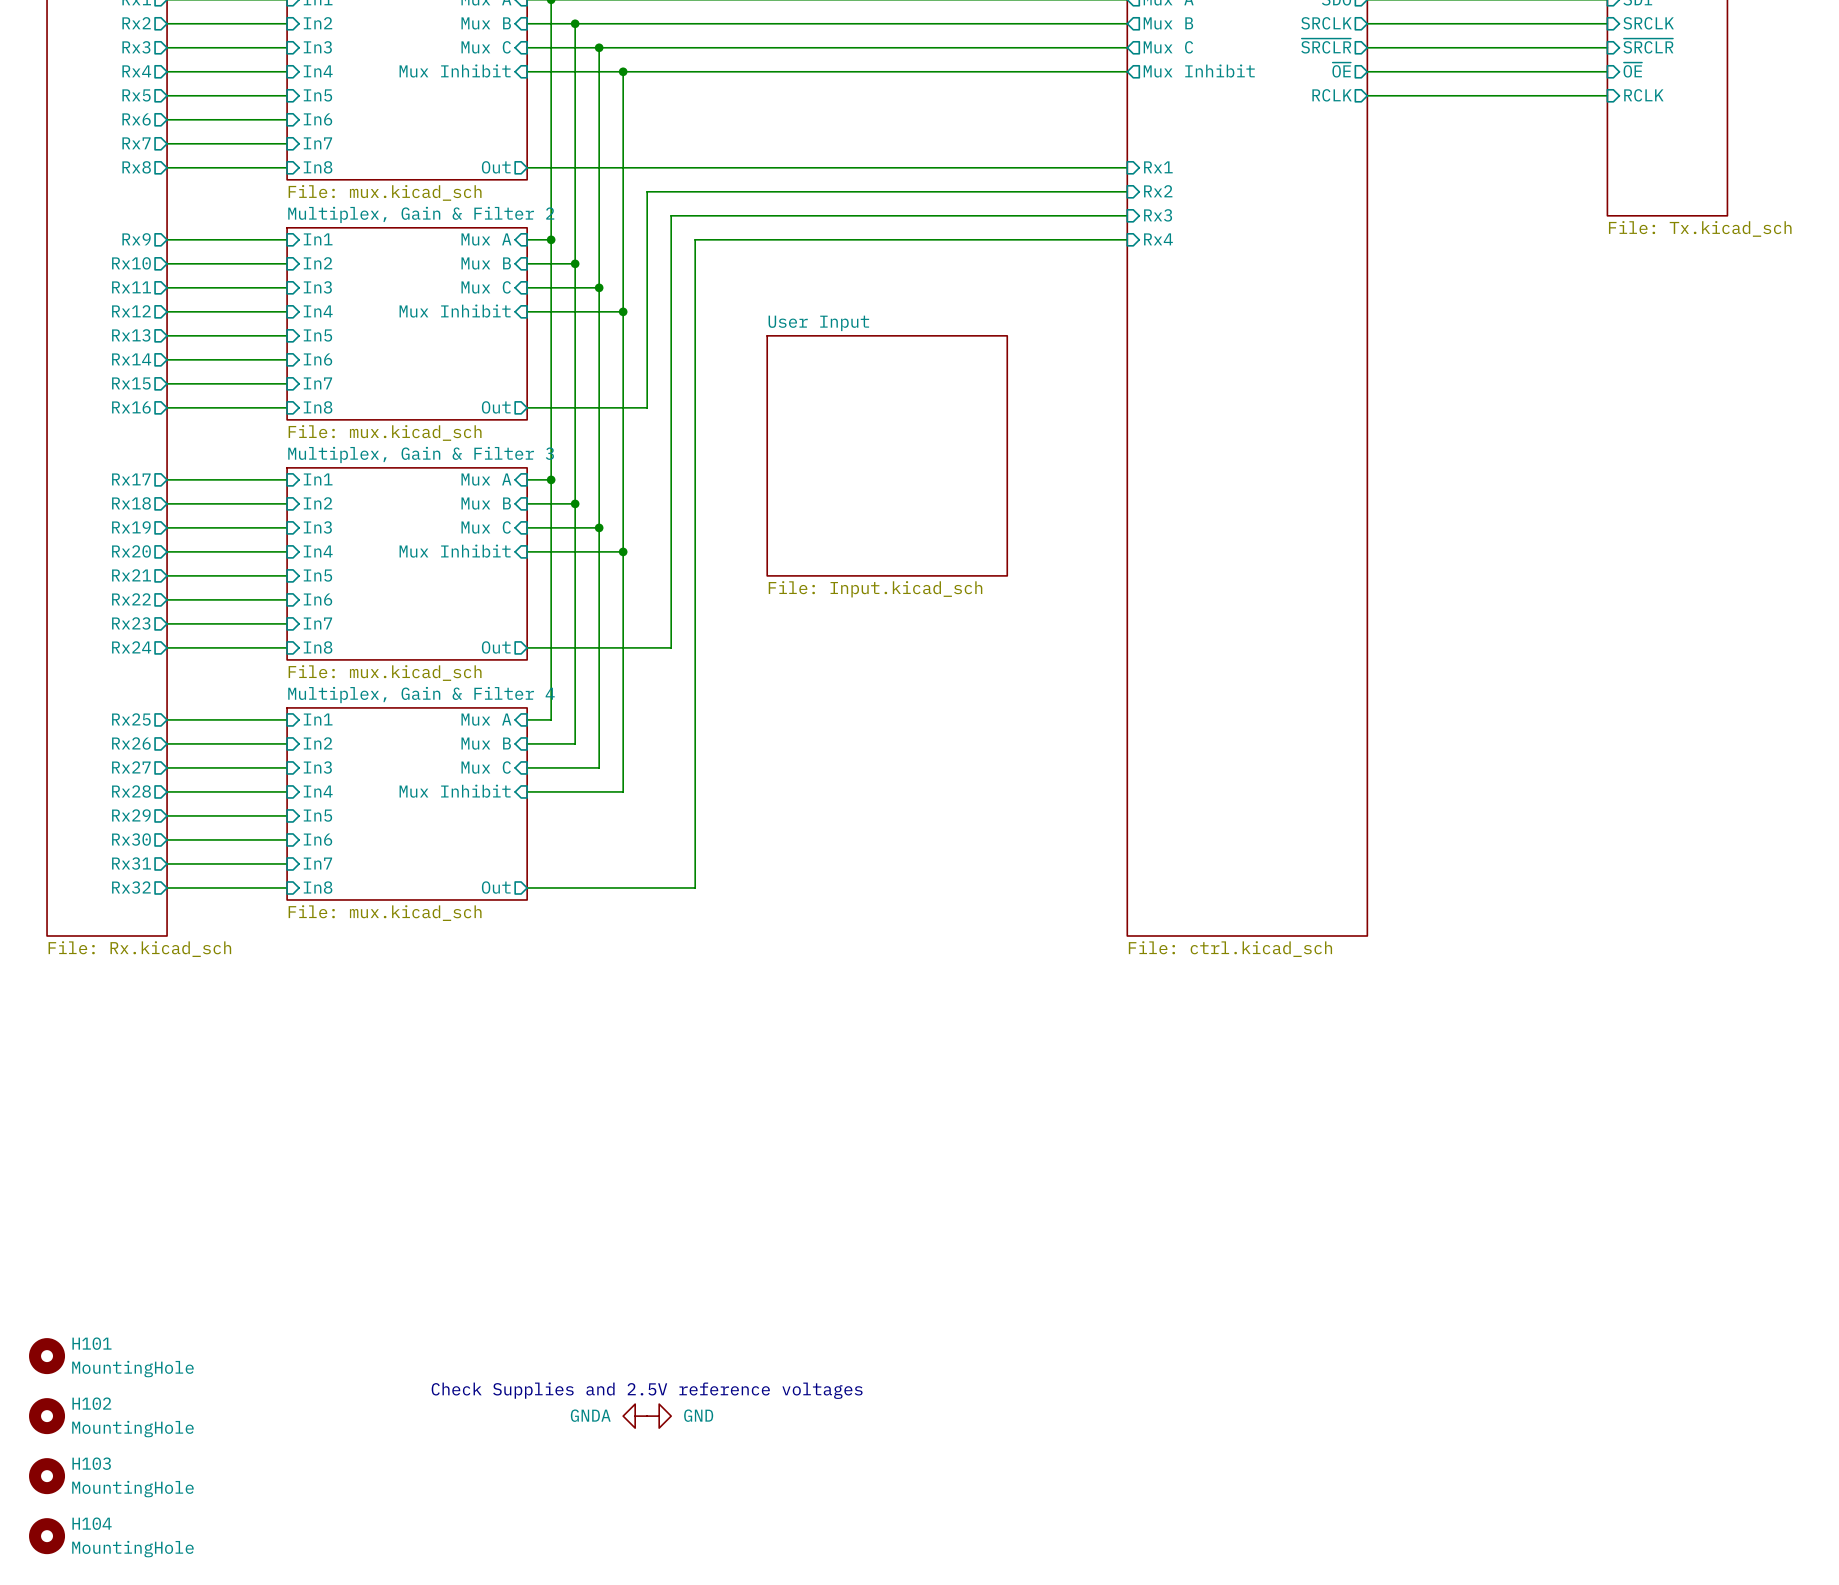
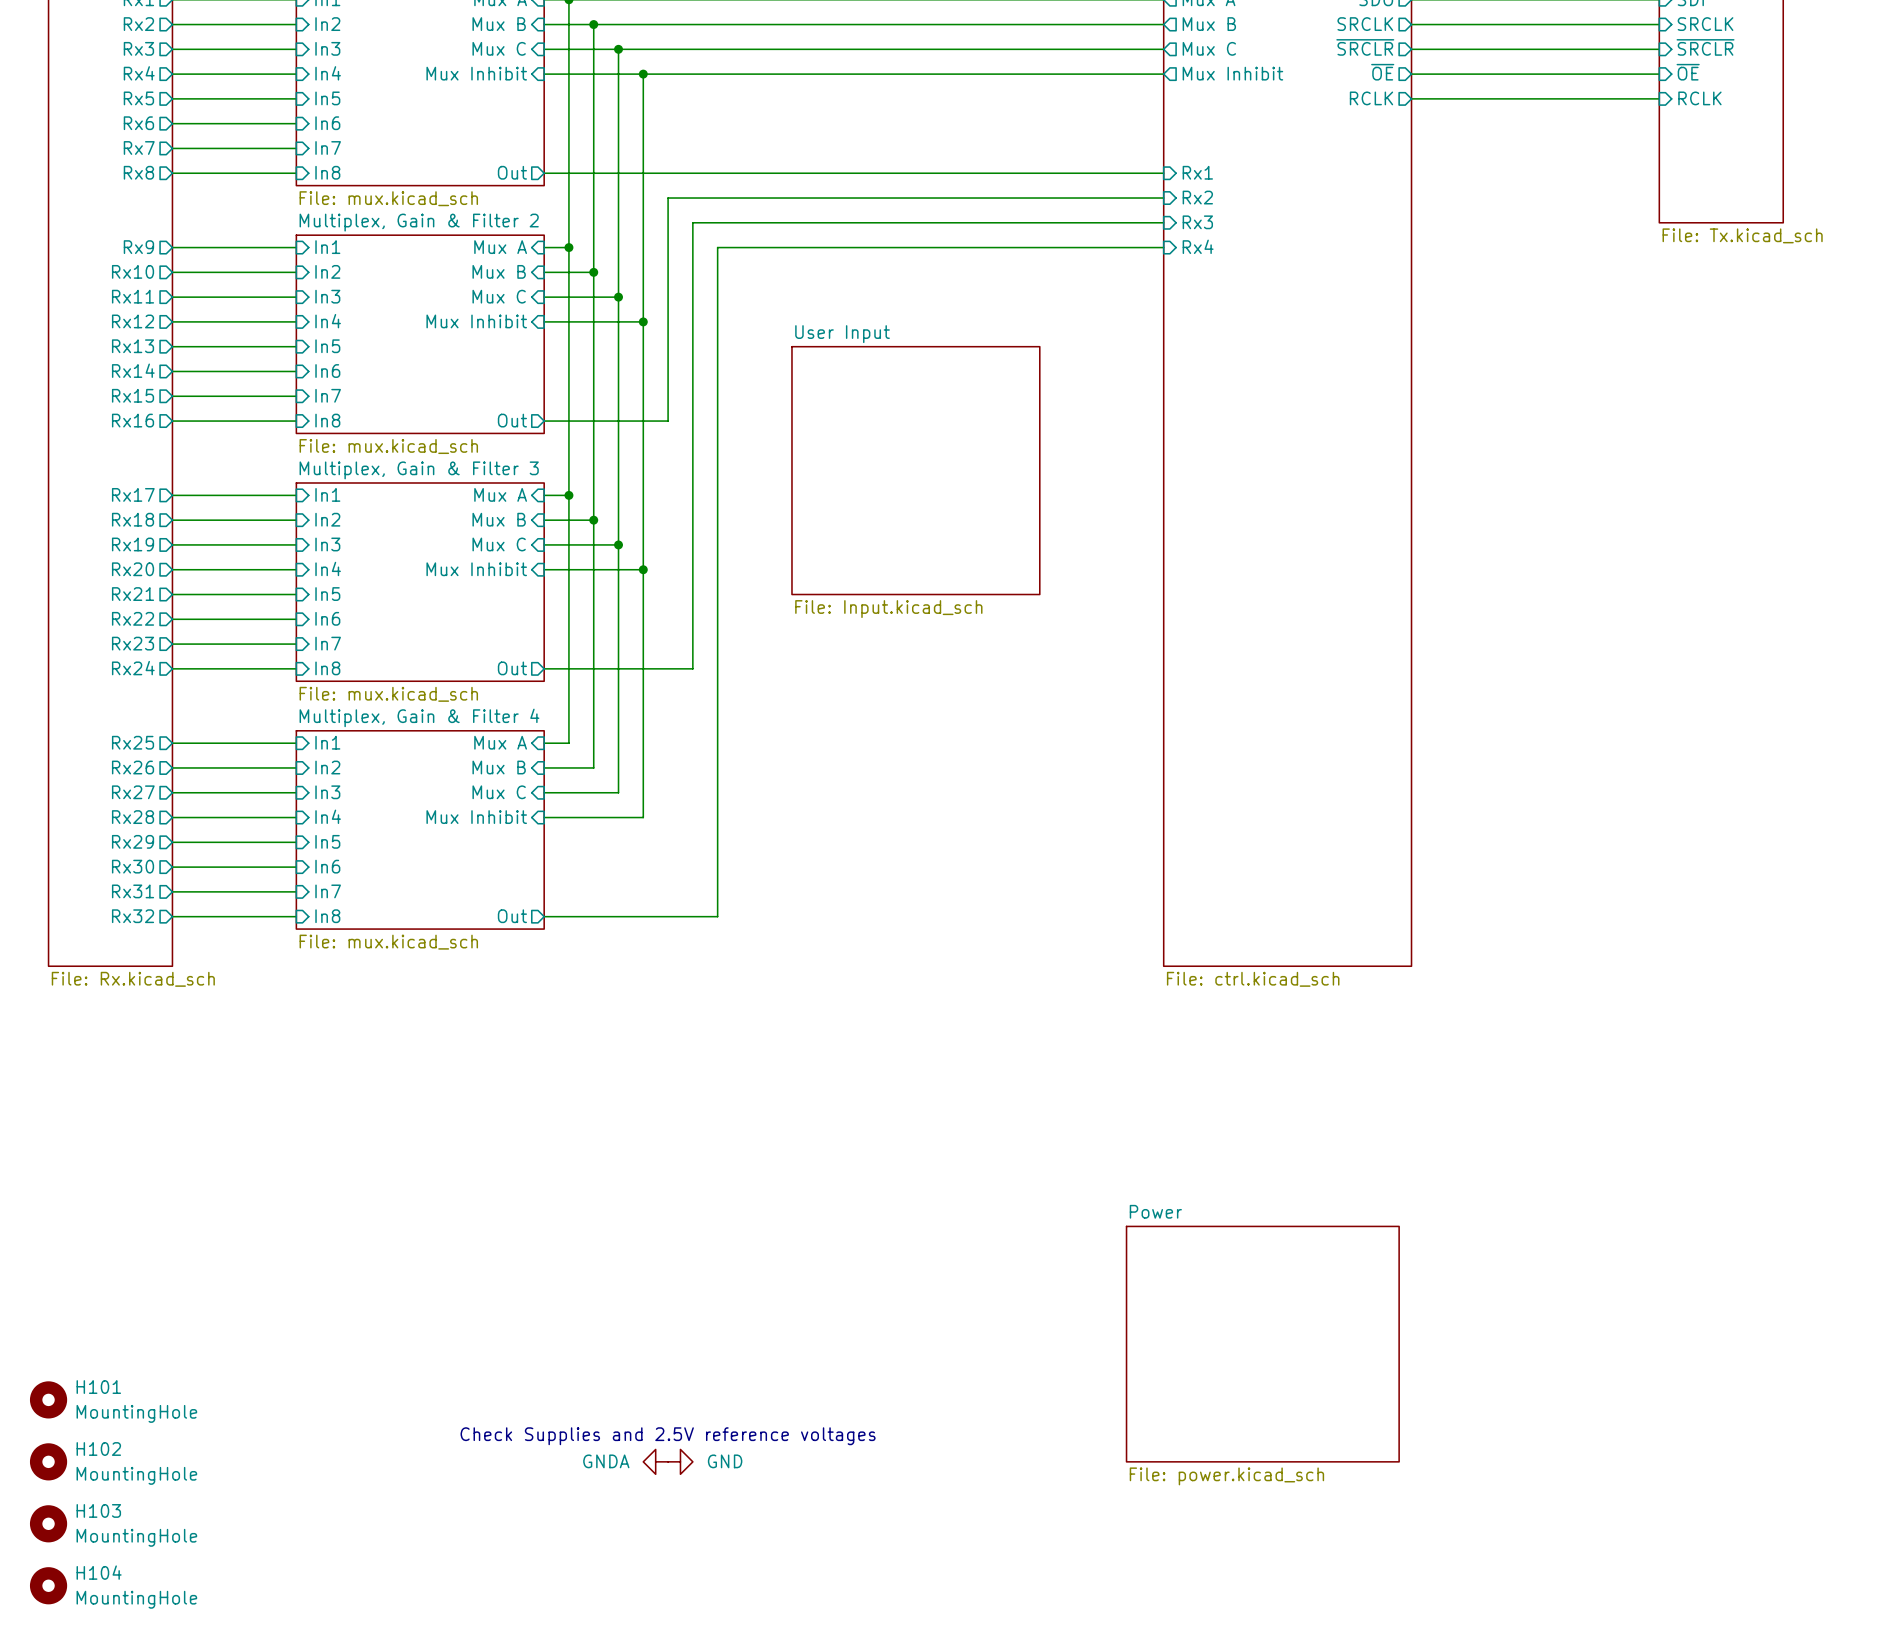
sheet Power: none -> File: power.kicad_sch (1262, 1344)

